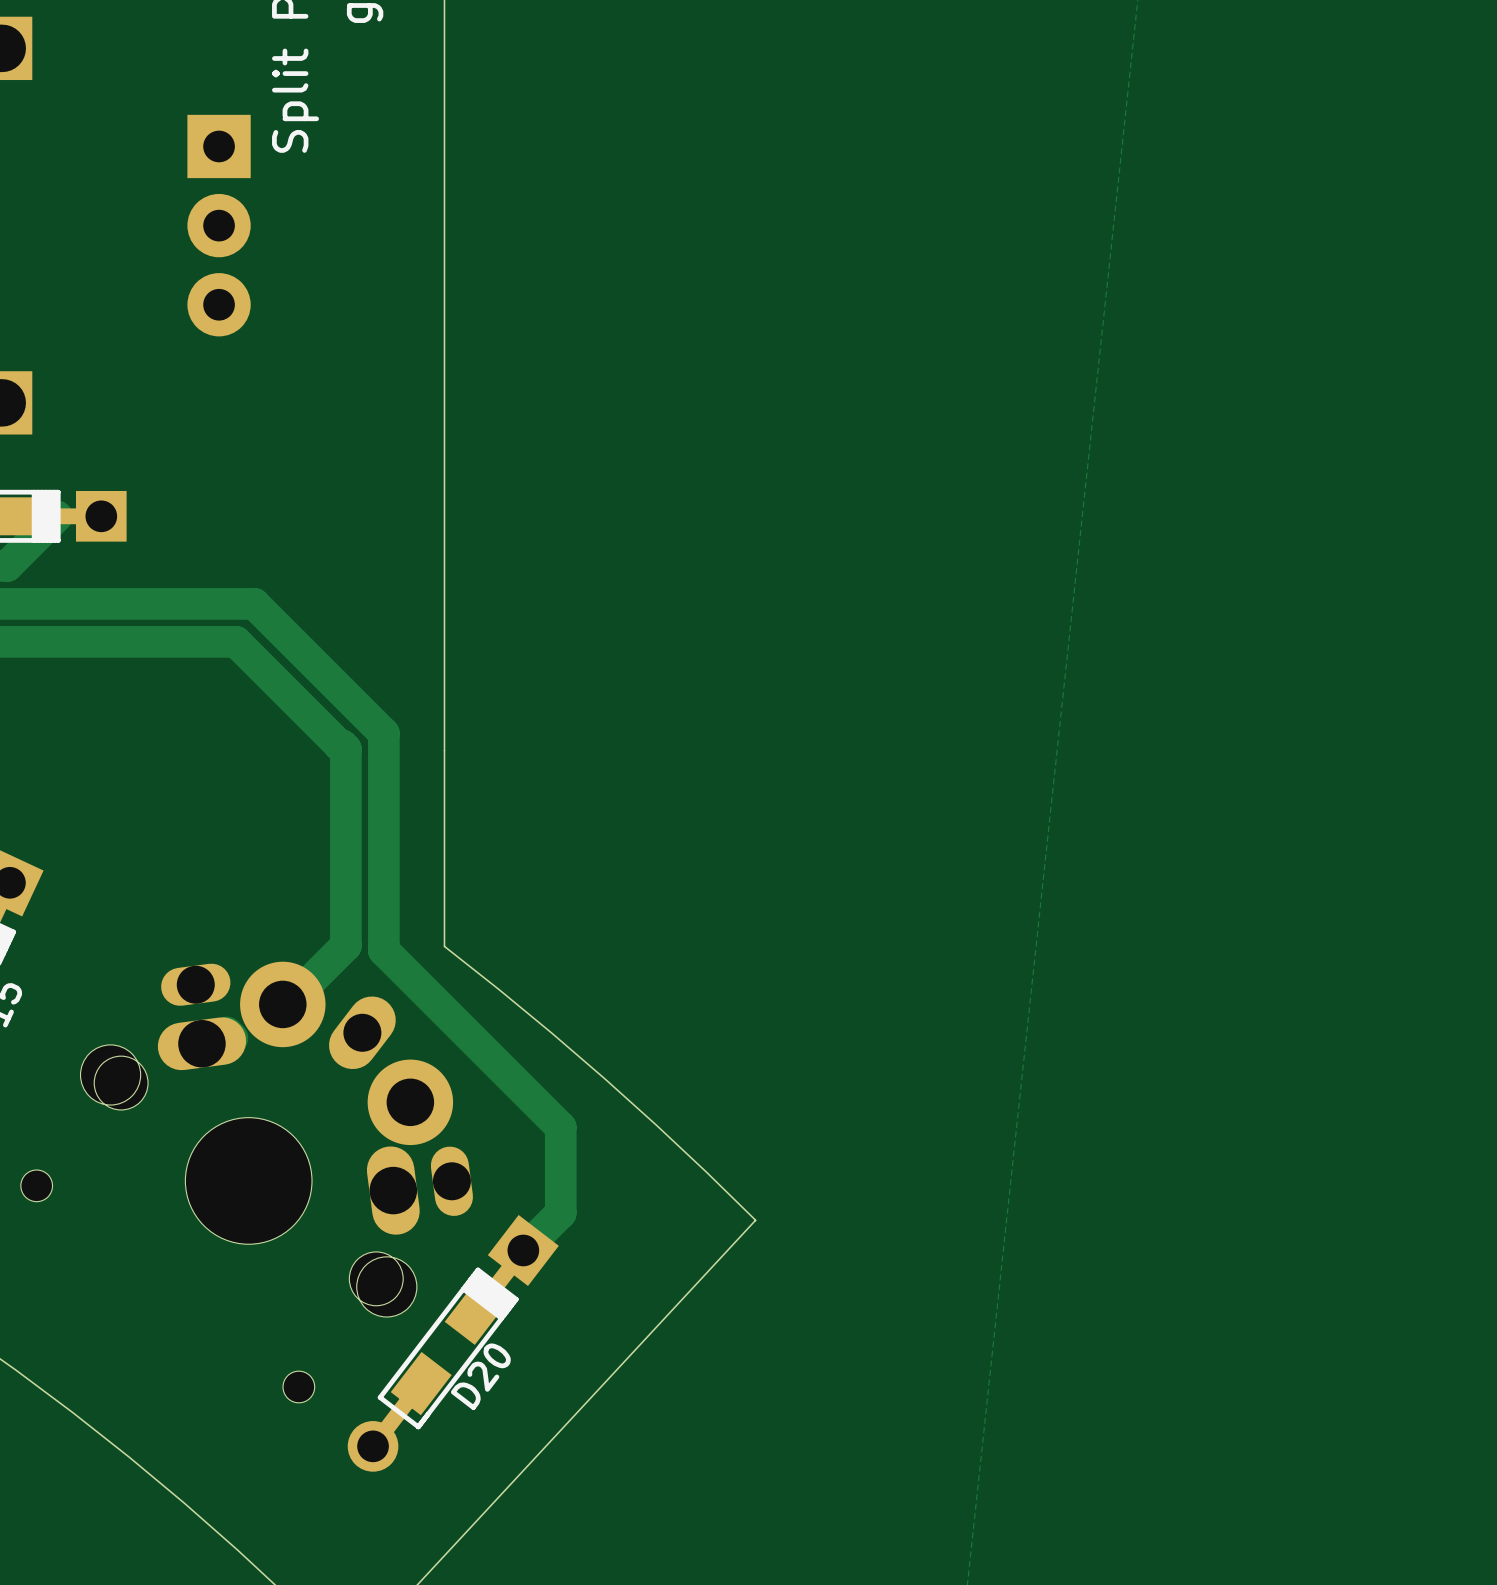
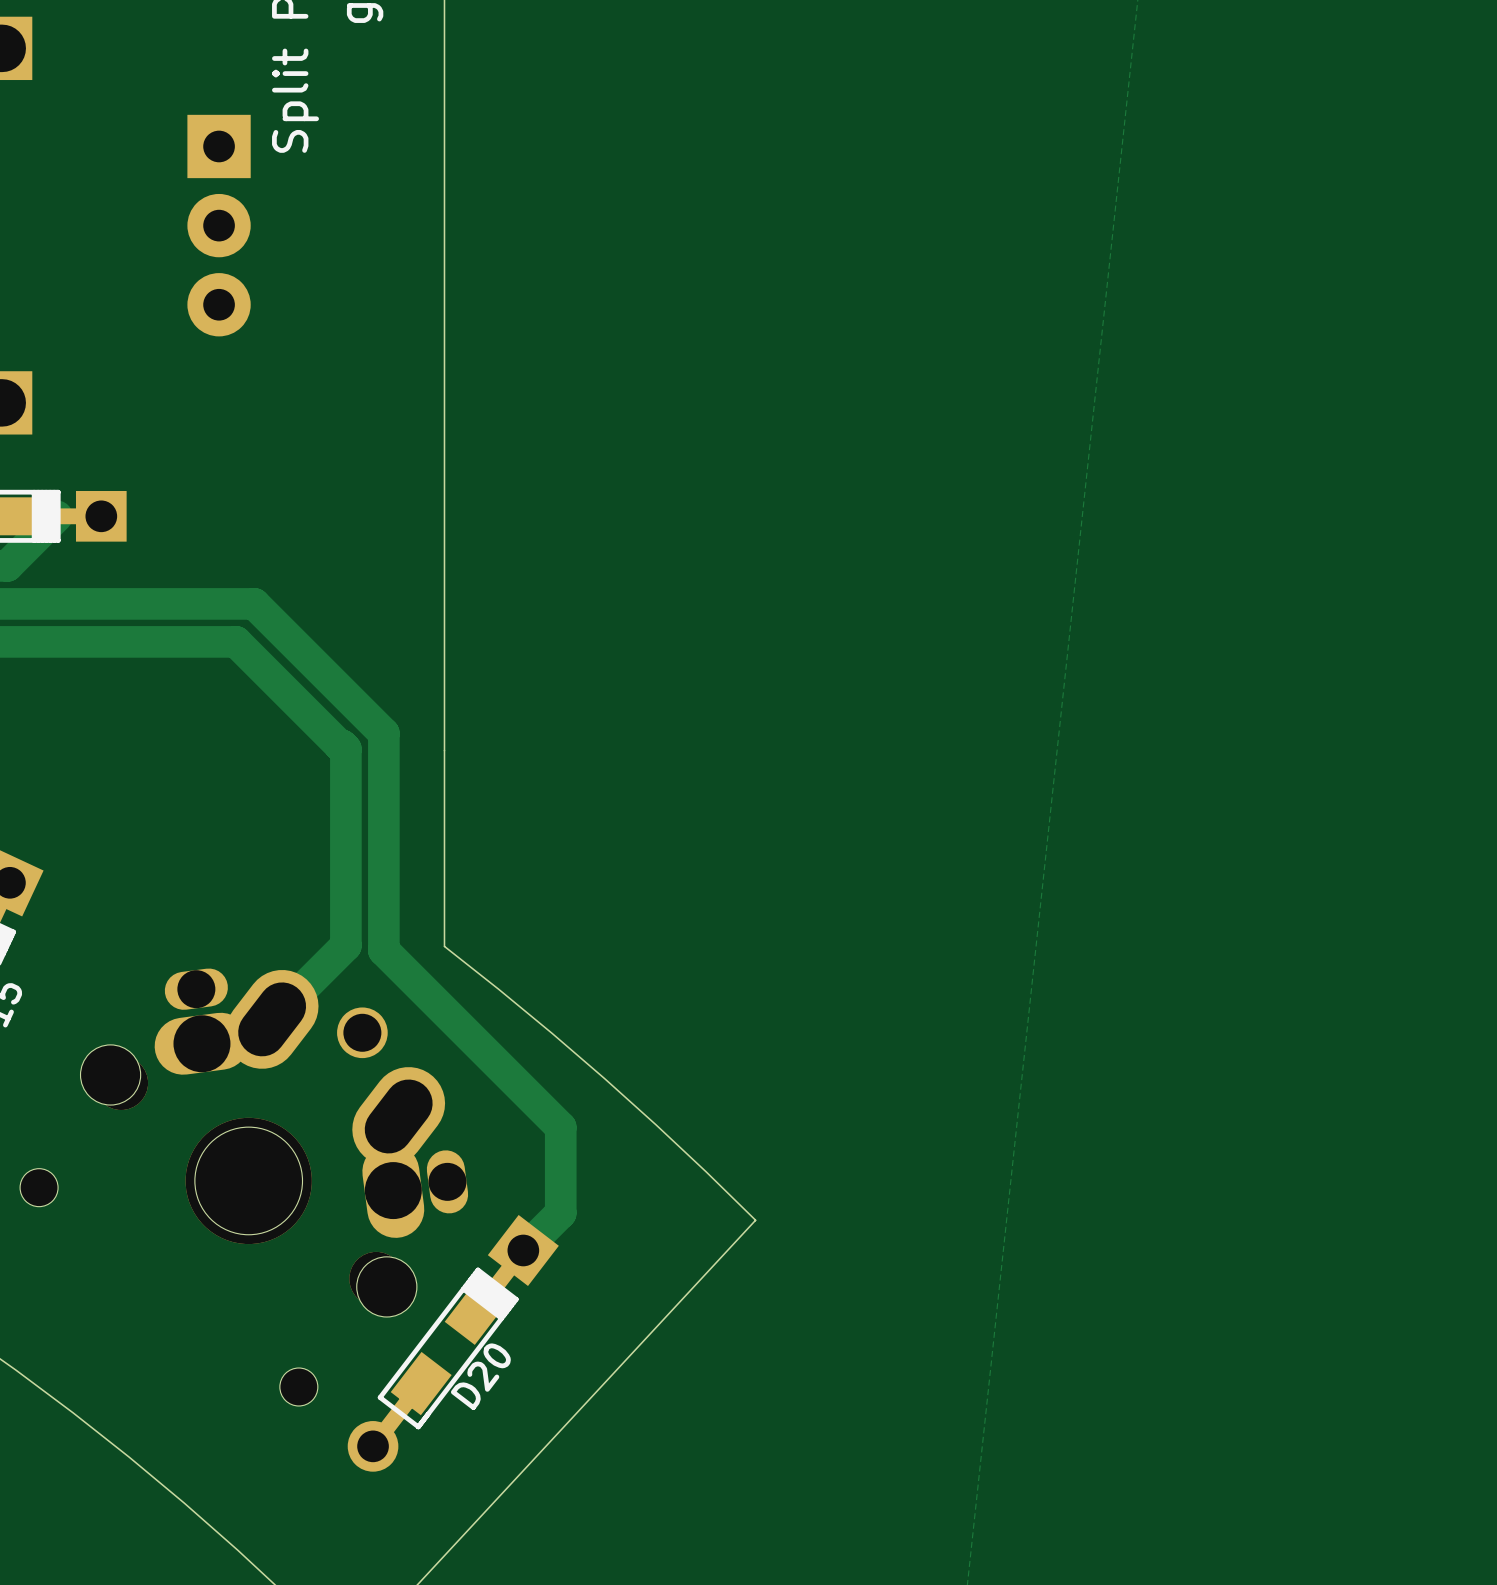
part footprint: [20, 961, 473, 1403] -> [20, 968, 469, 1406]

